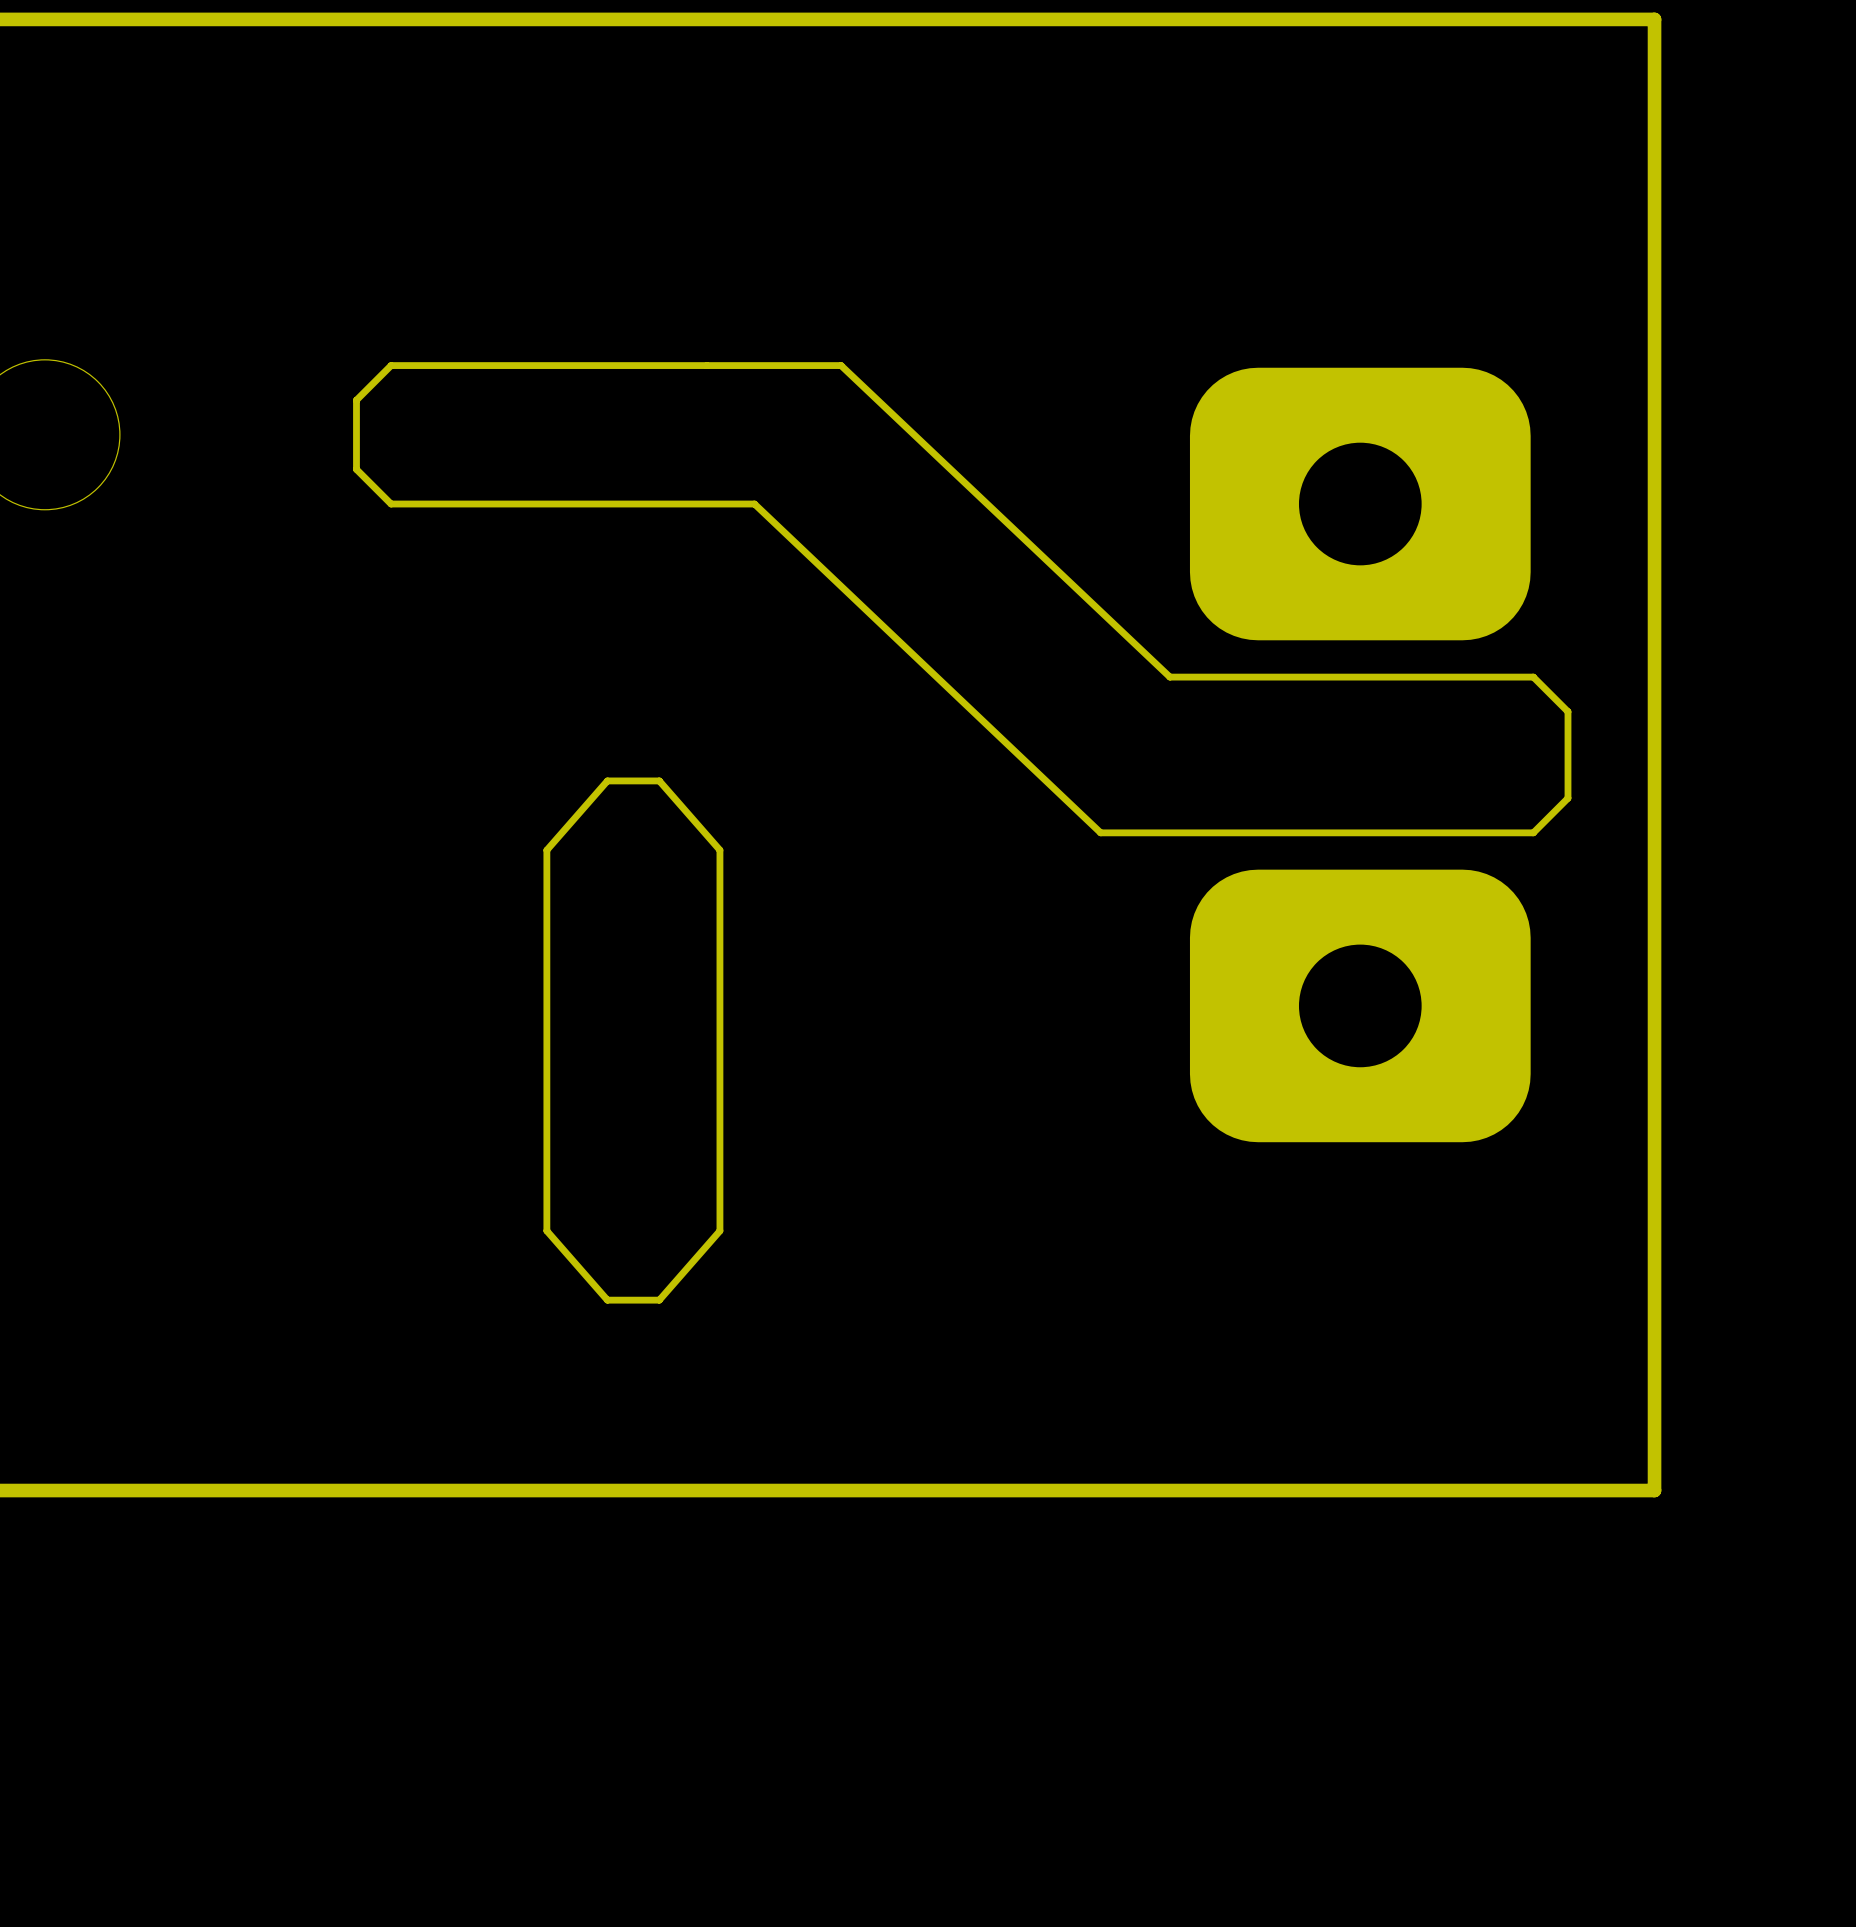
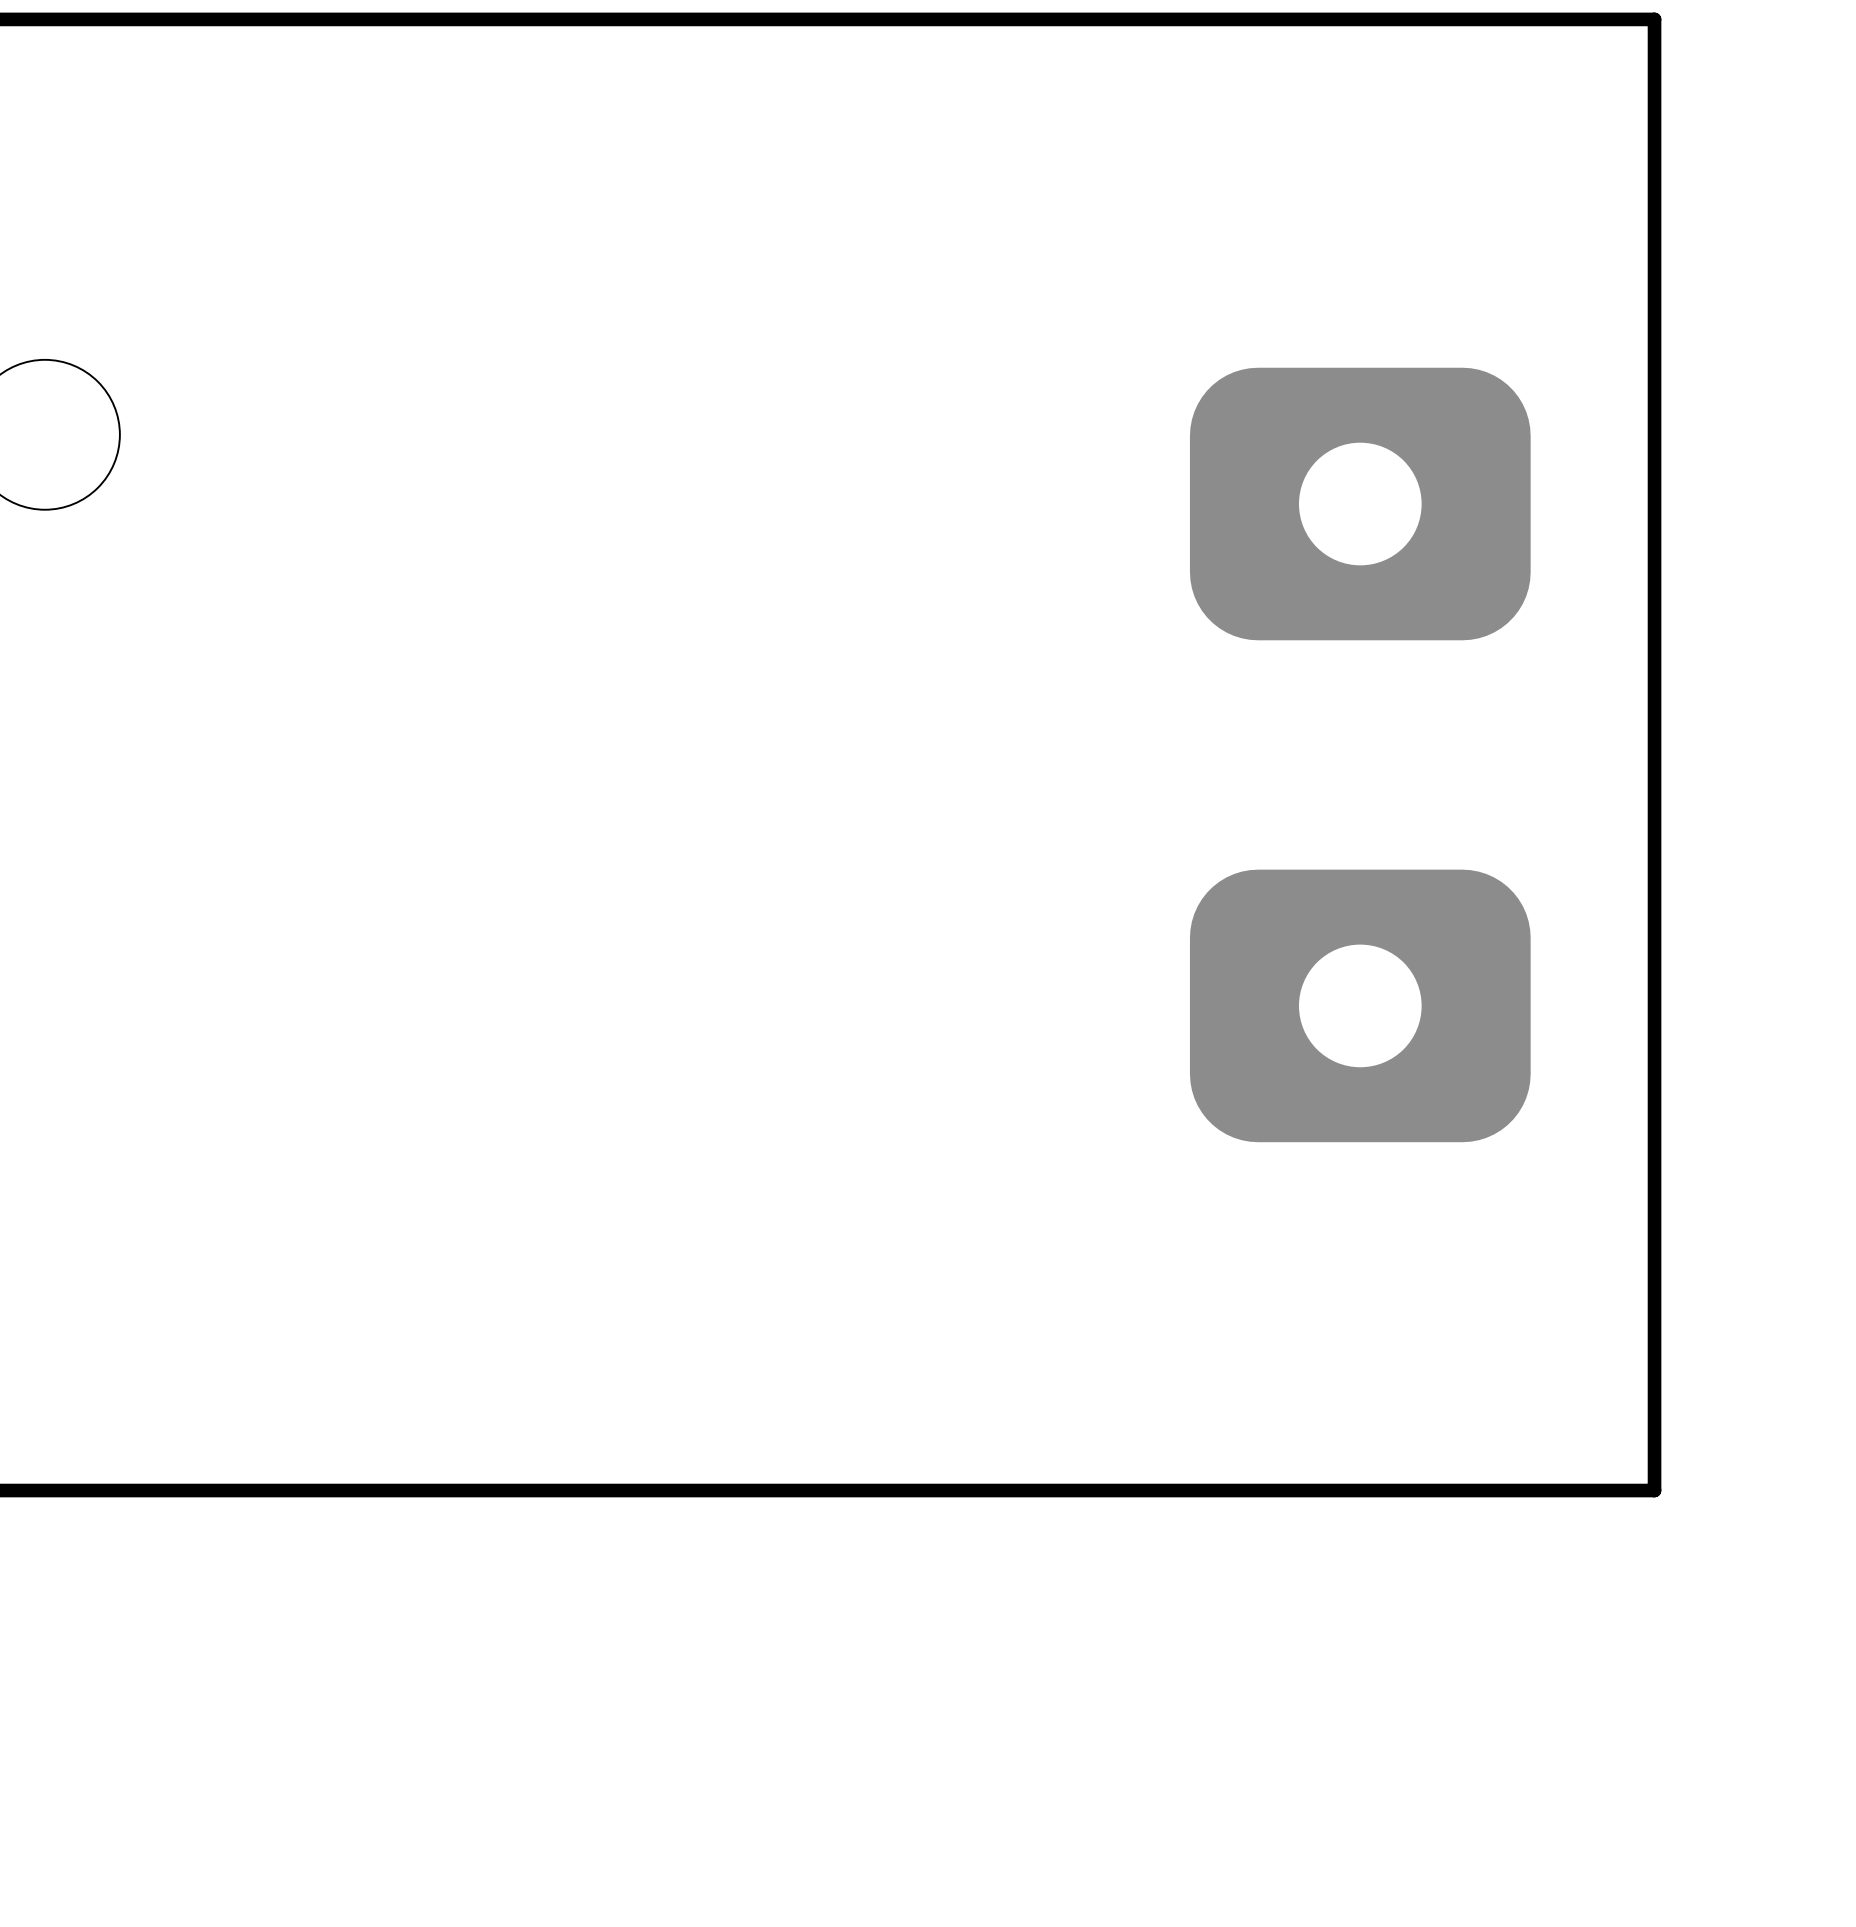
board edge: (841, 365) (1169, 677) (1533, 677) (1567, 711) (1567, 798) (1533, 832) (1100, 832) (754, 504) (391, 504) (356, 469) (356, 400) (391, 365) (841, 365) -> none
board edge: (659, 780) (719, 850) (719, 1230) (659, 1300) (607, 1300) (546, 1230) (546, 850) (607, 780) (659, 780) -> none

